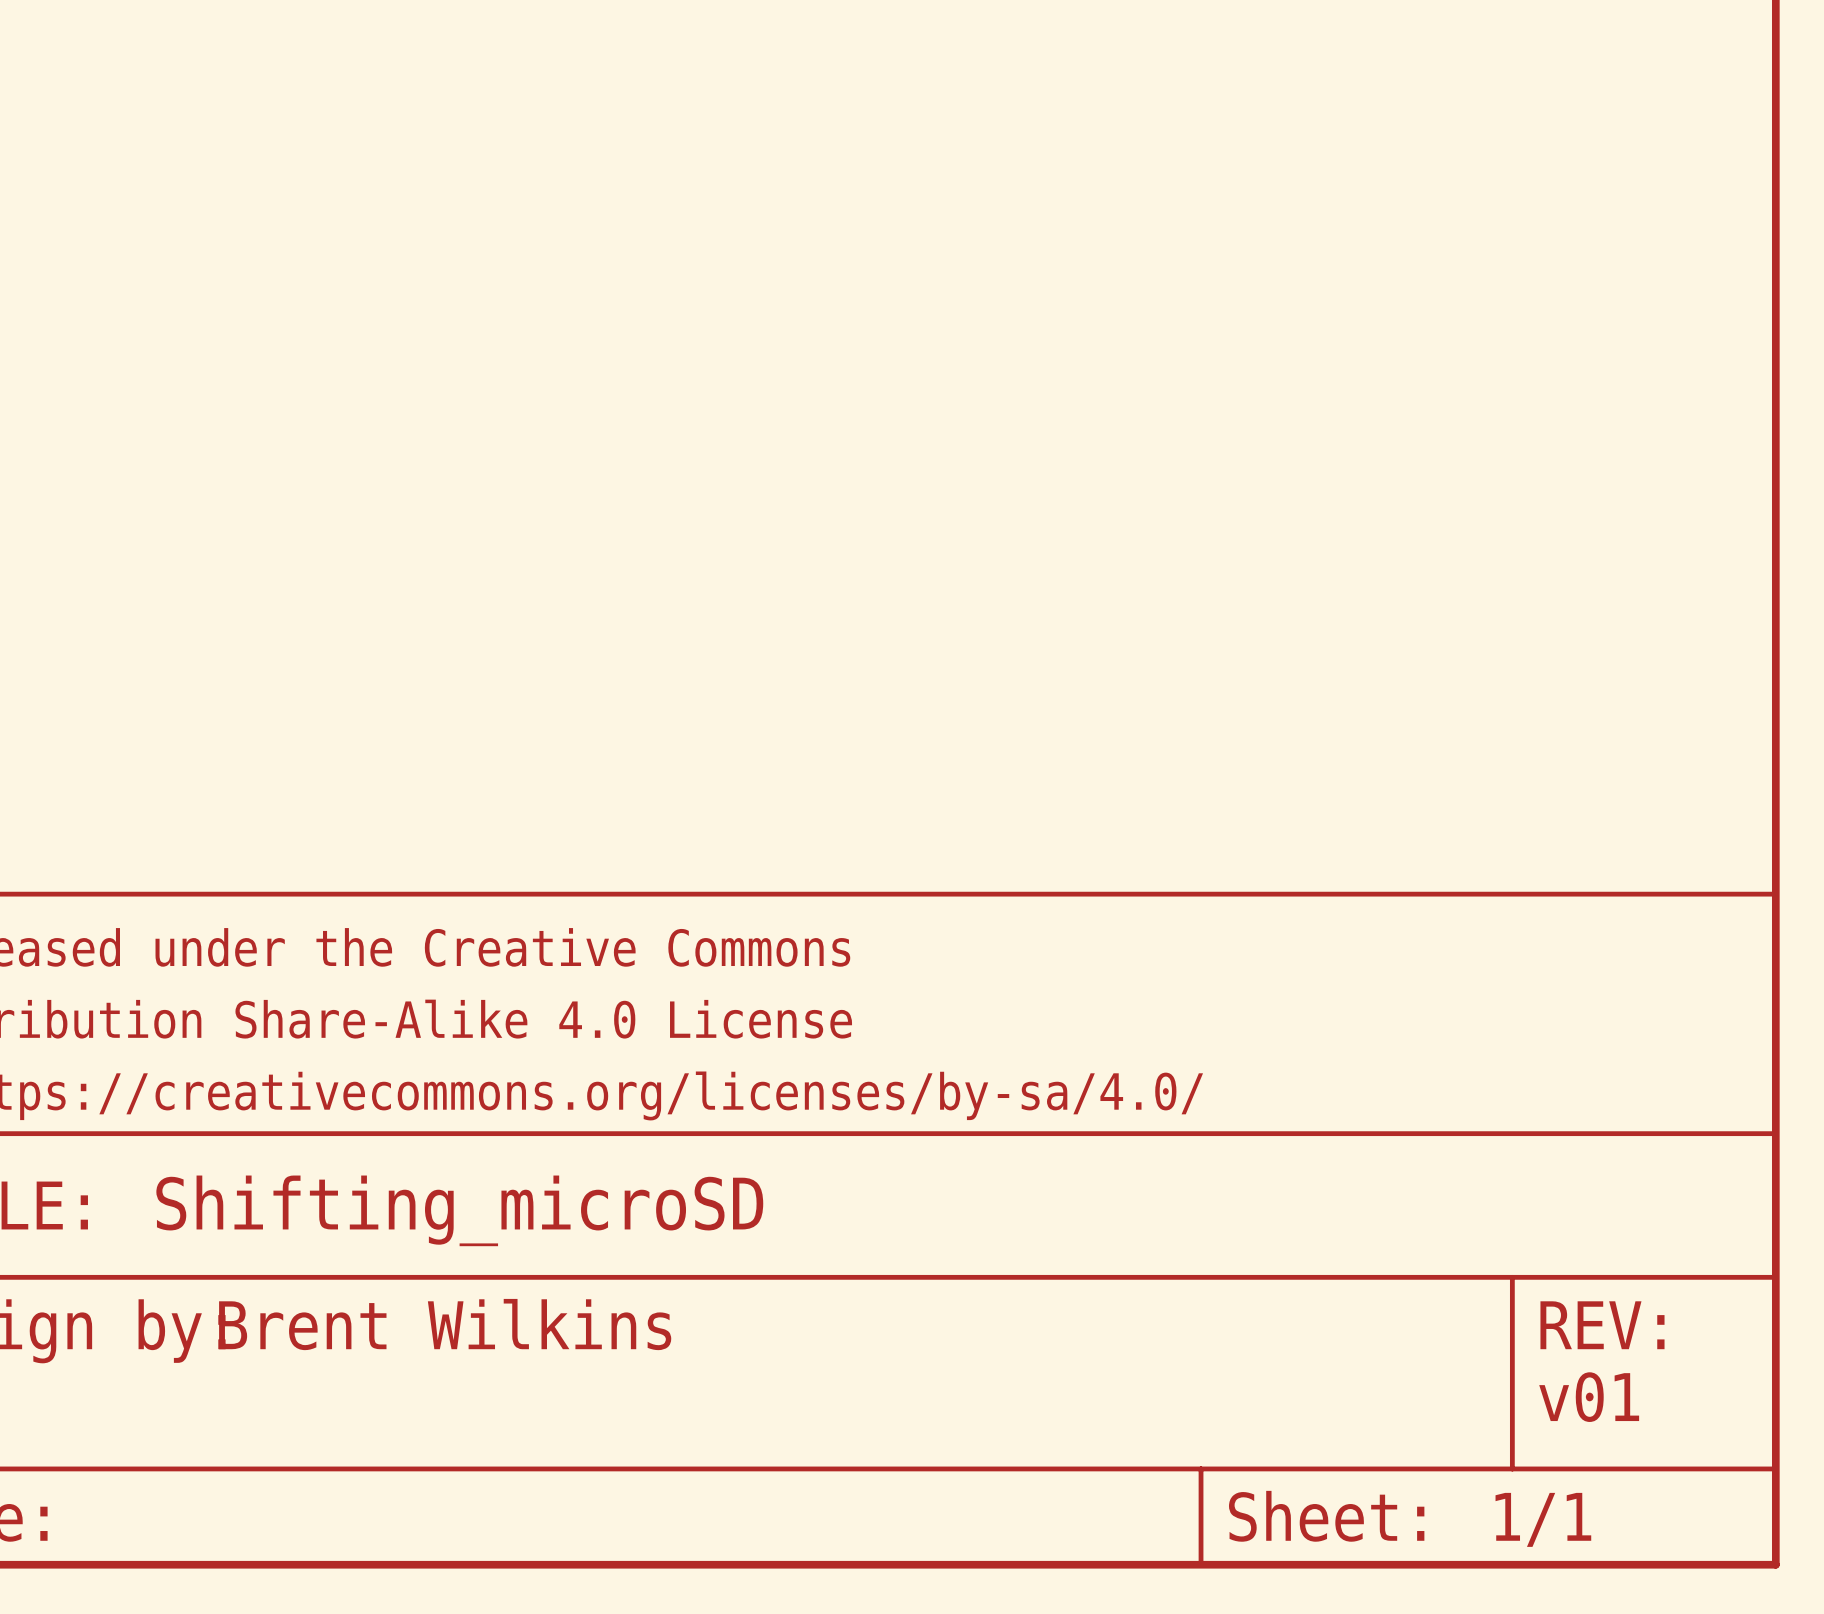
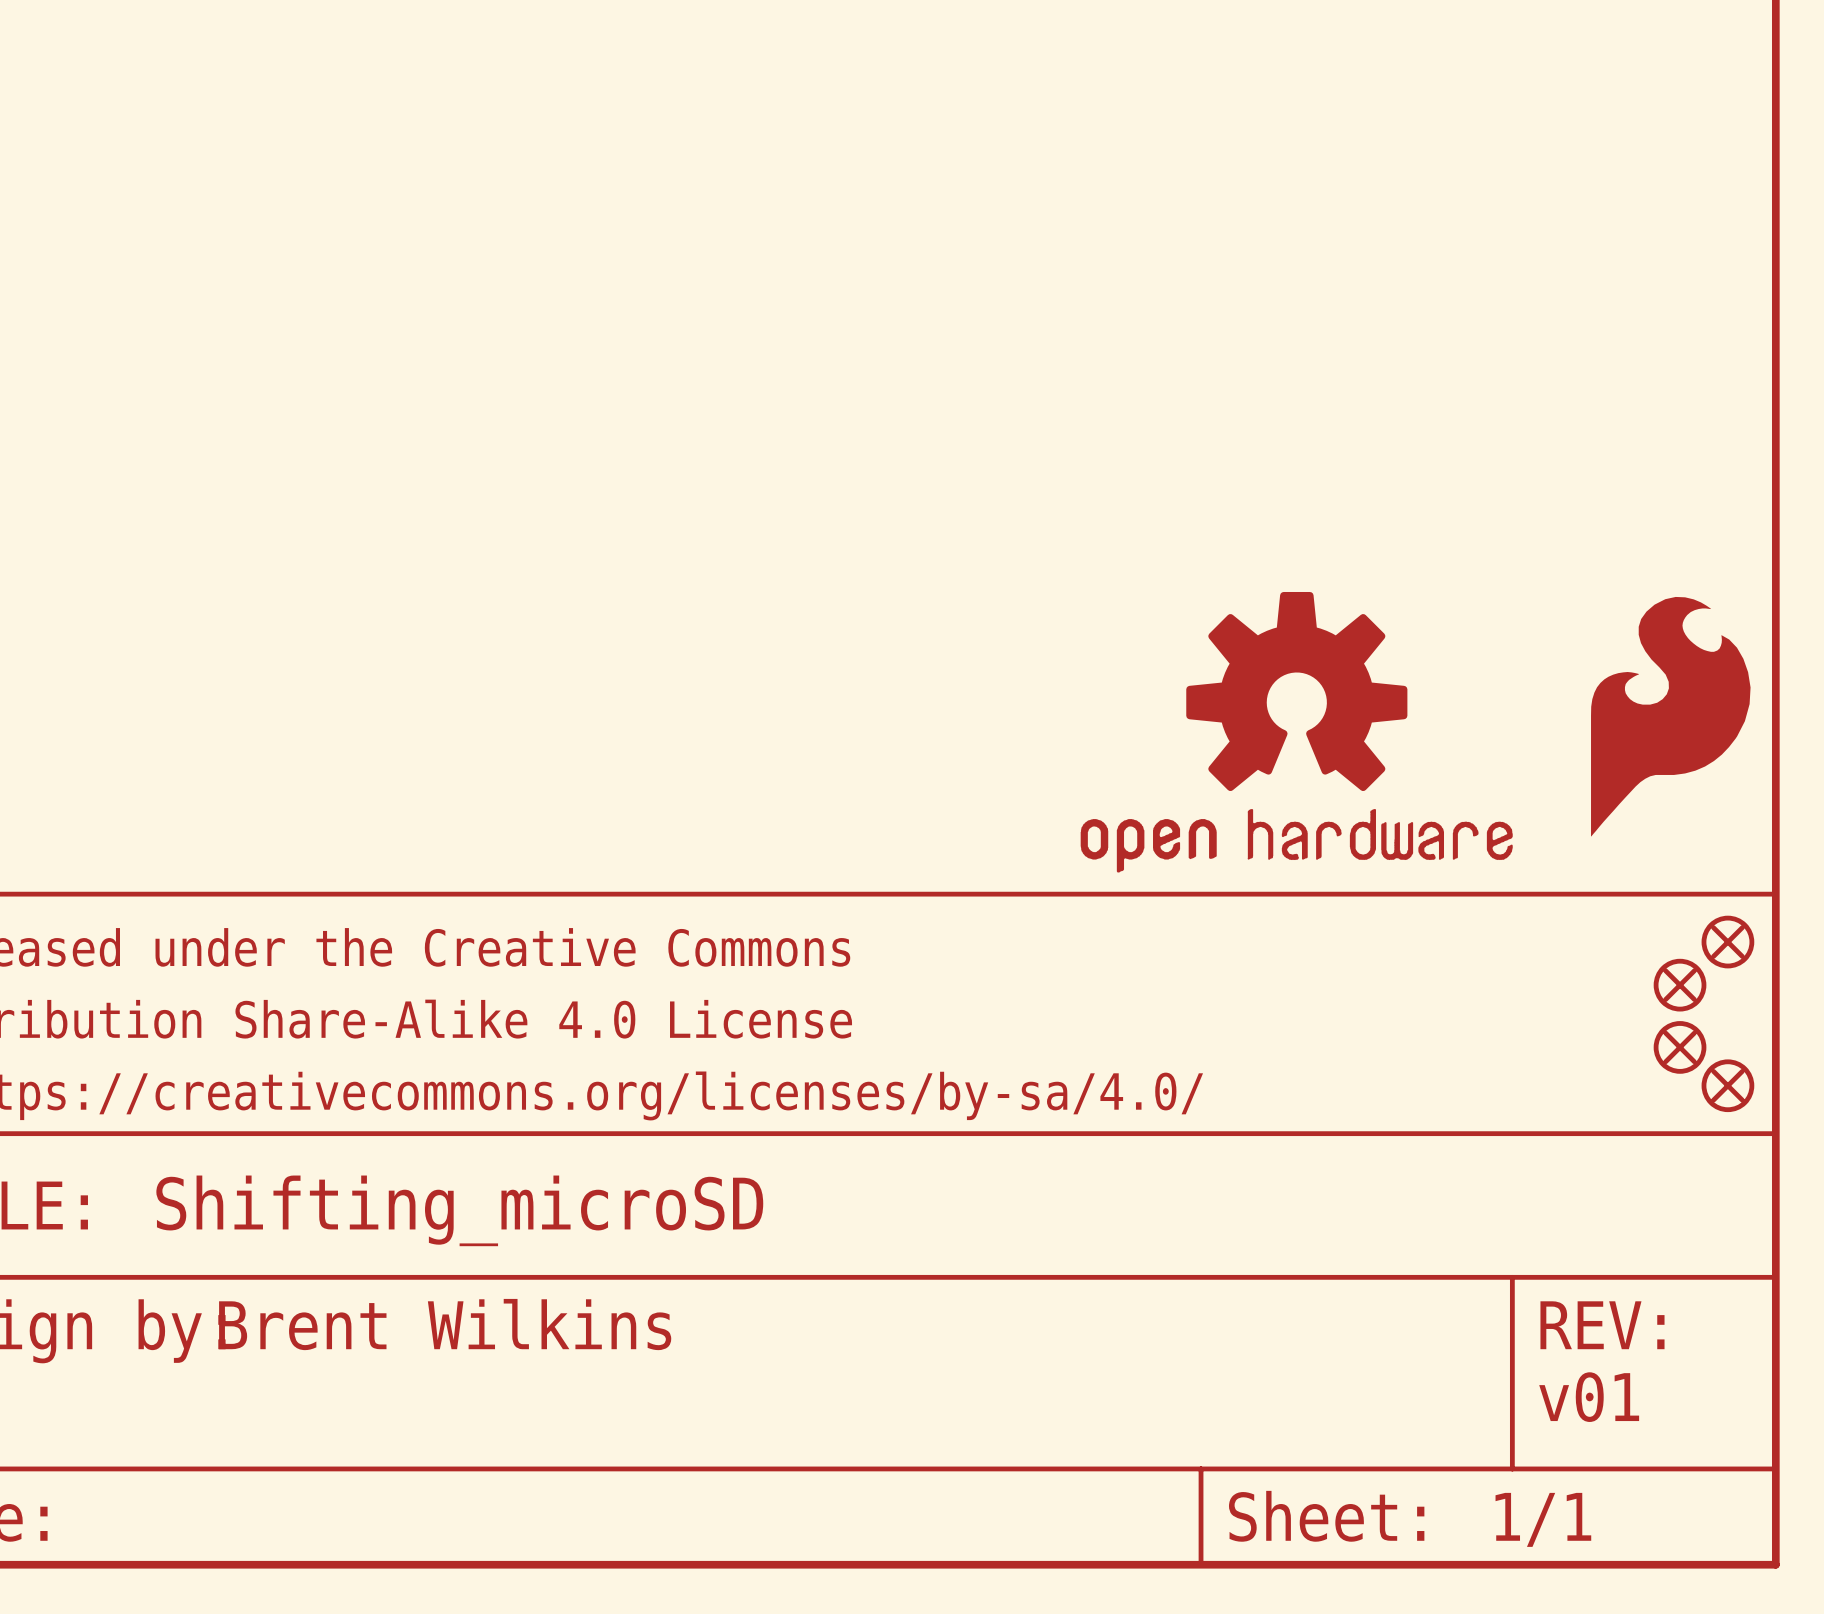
part: none -> (1670, 716)
part: none -> (1296, 732)
part: none -> (1727, 942)
part: none -> (1680, 985)
part: none -> (1680, 1047)
part: none -> (1727, 1085)

